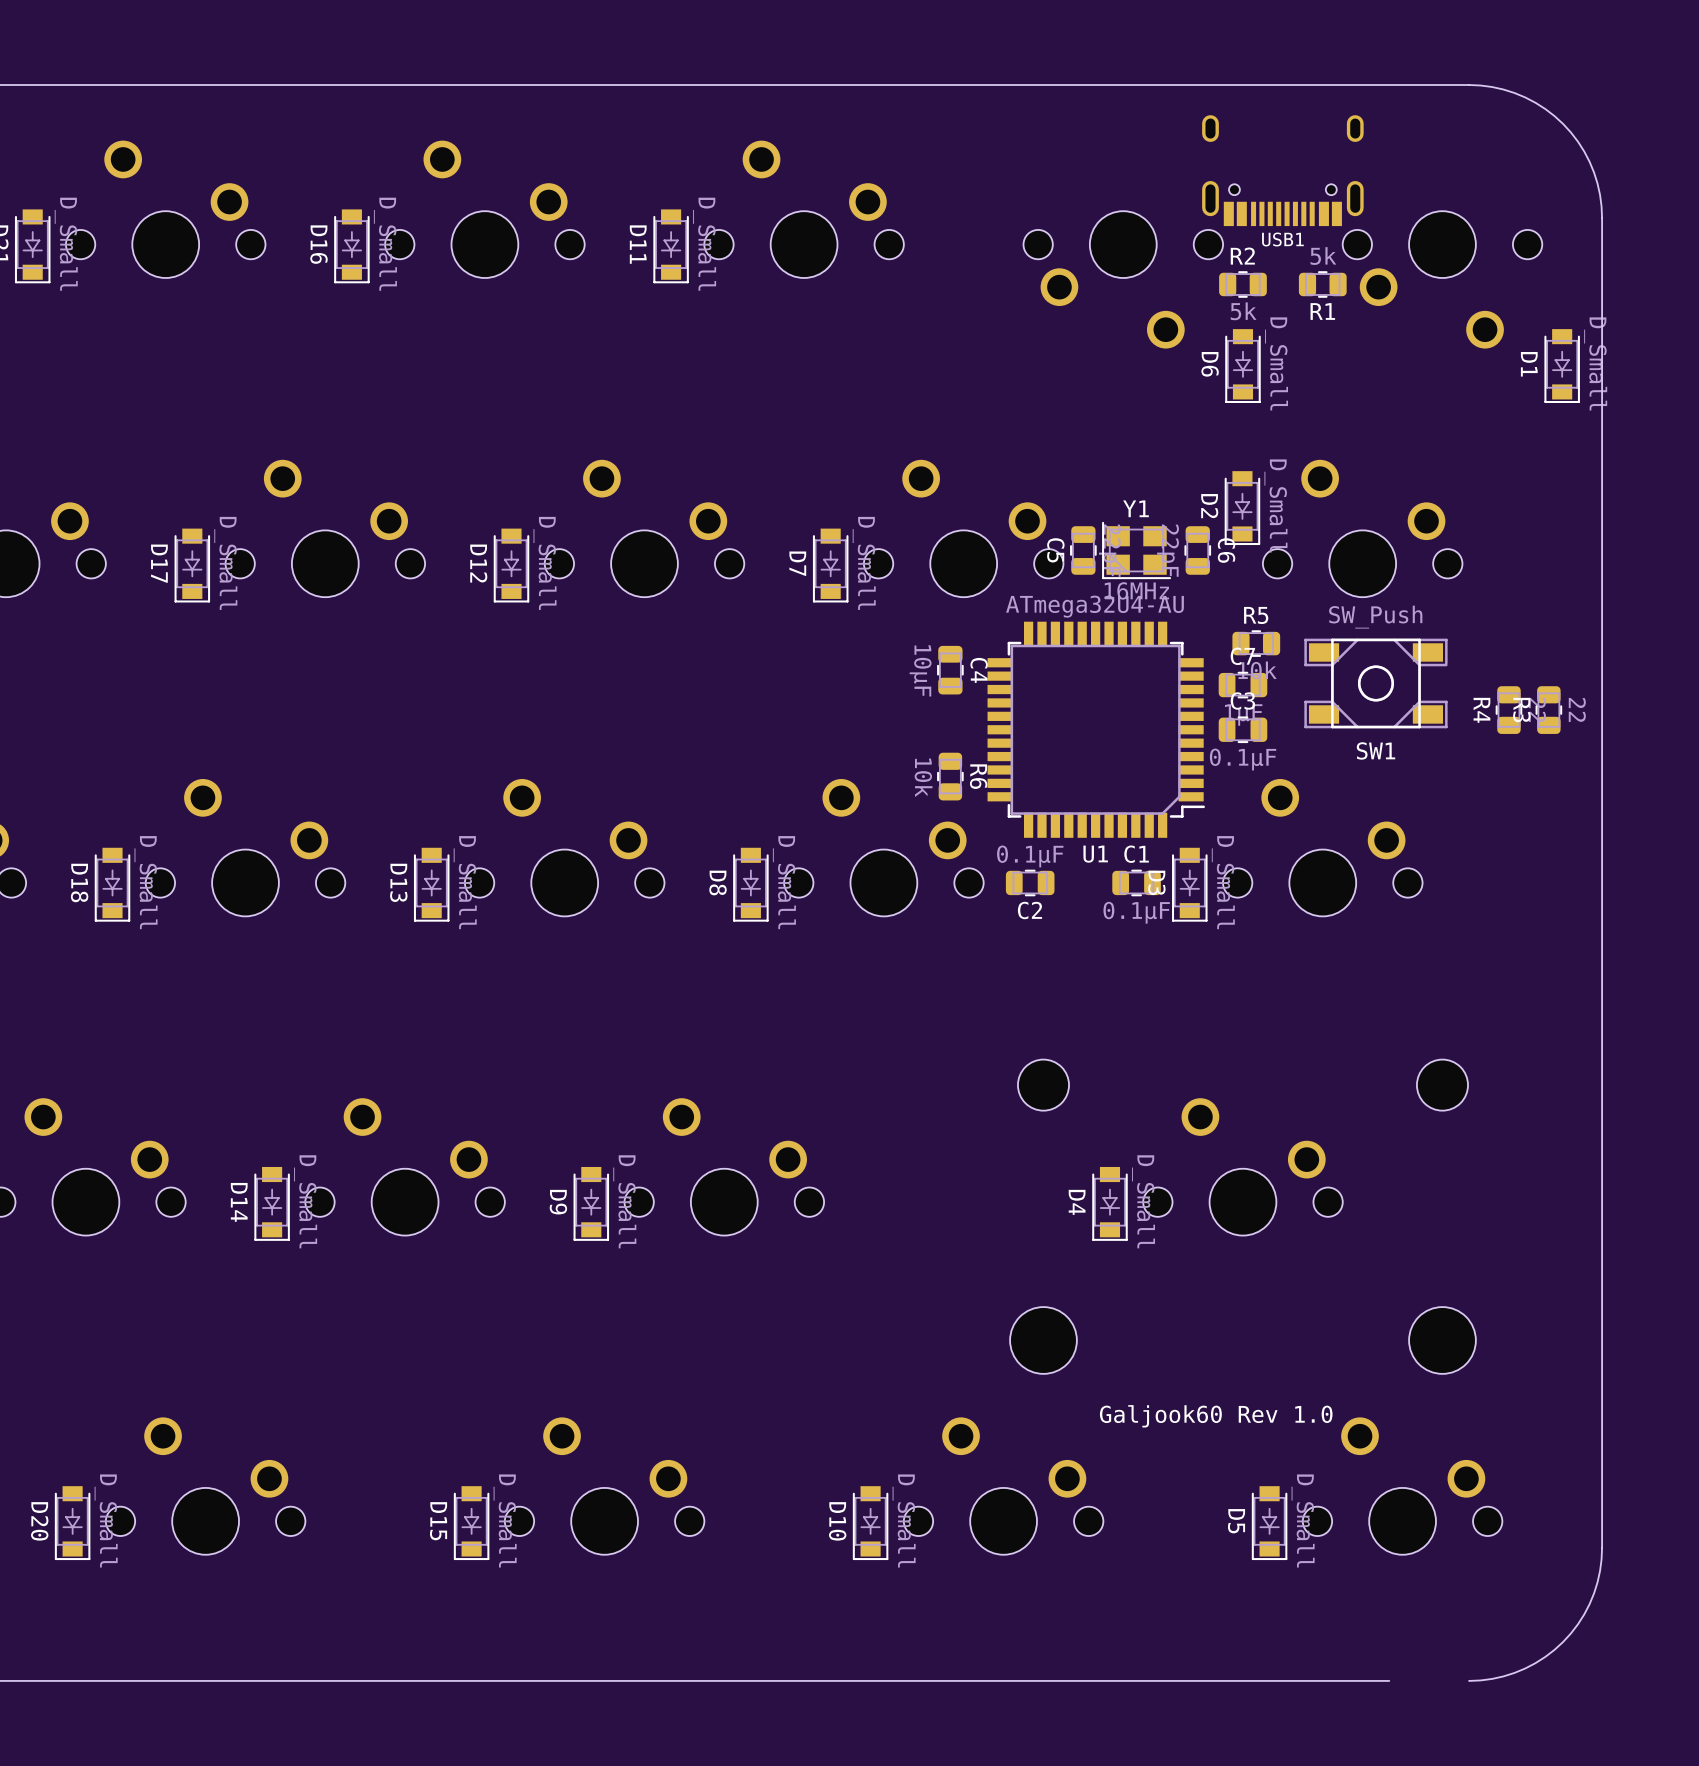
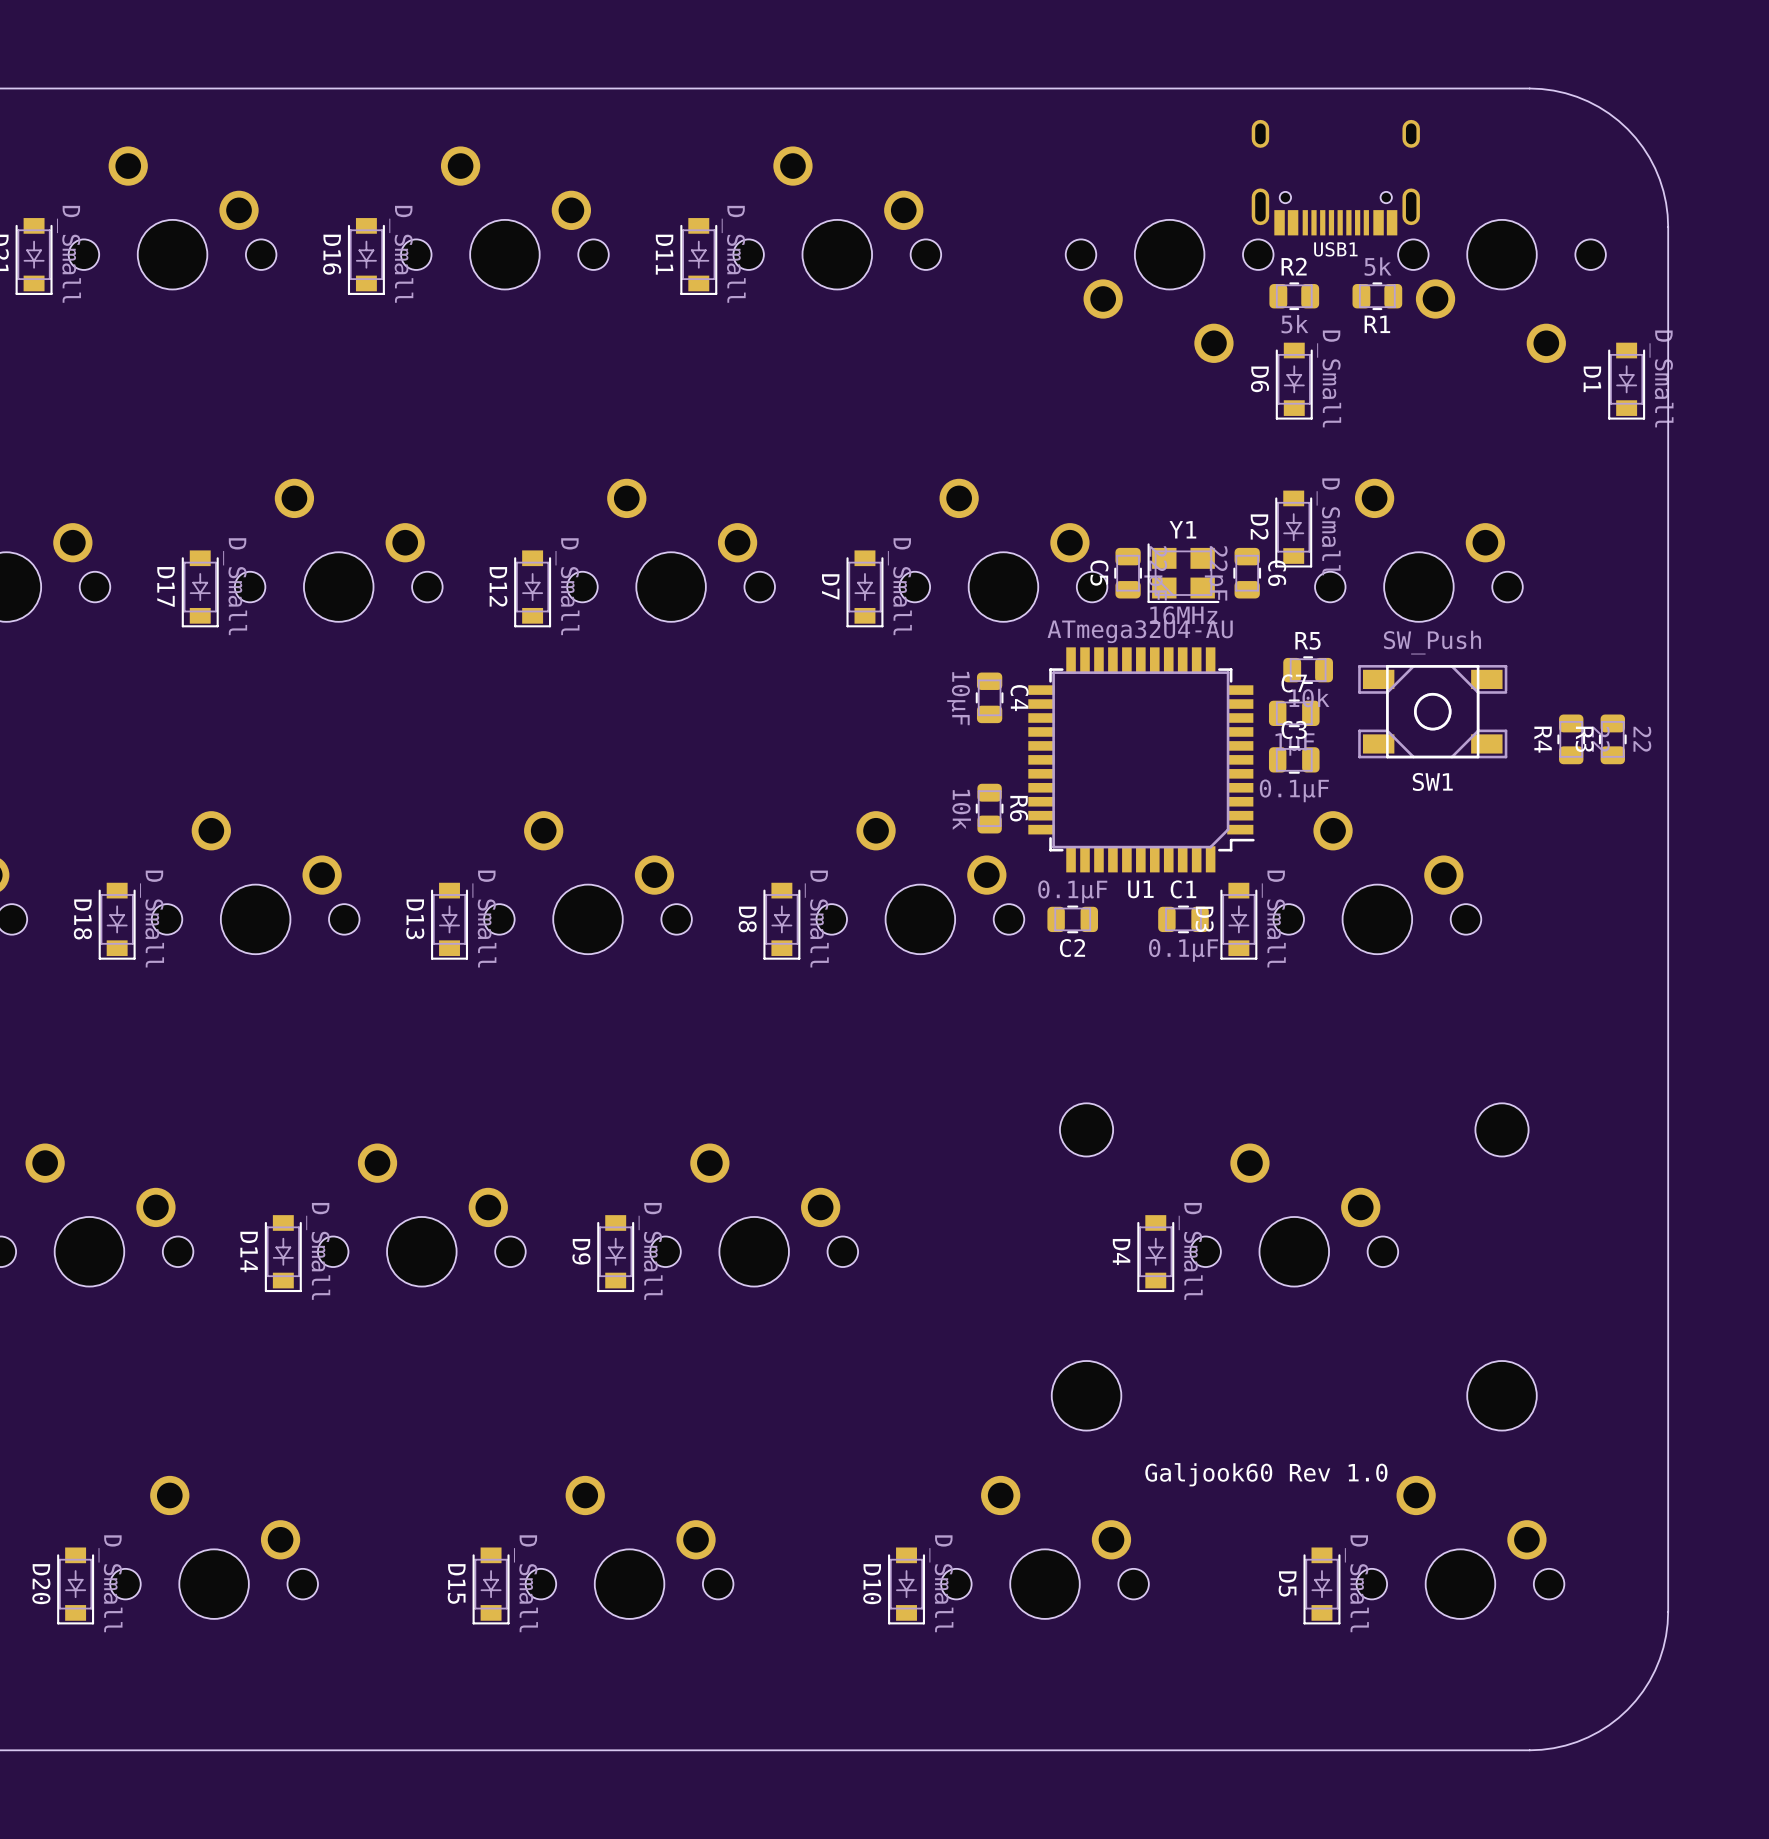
board edge: none -> (1529, 1750) (1446, 1750)

